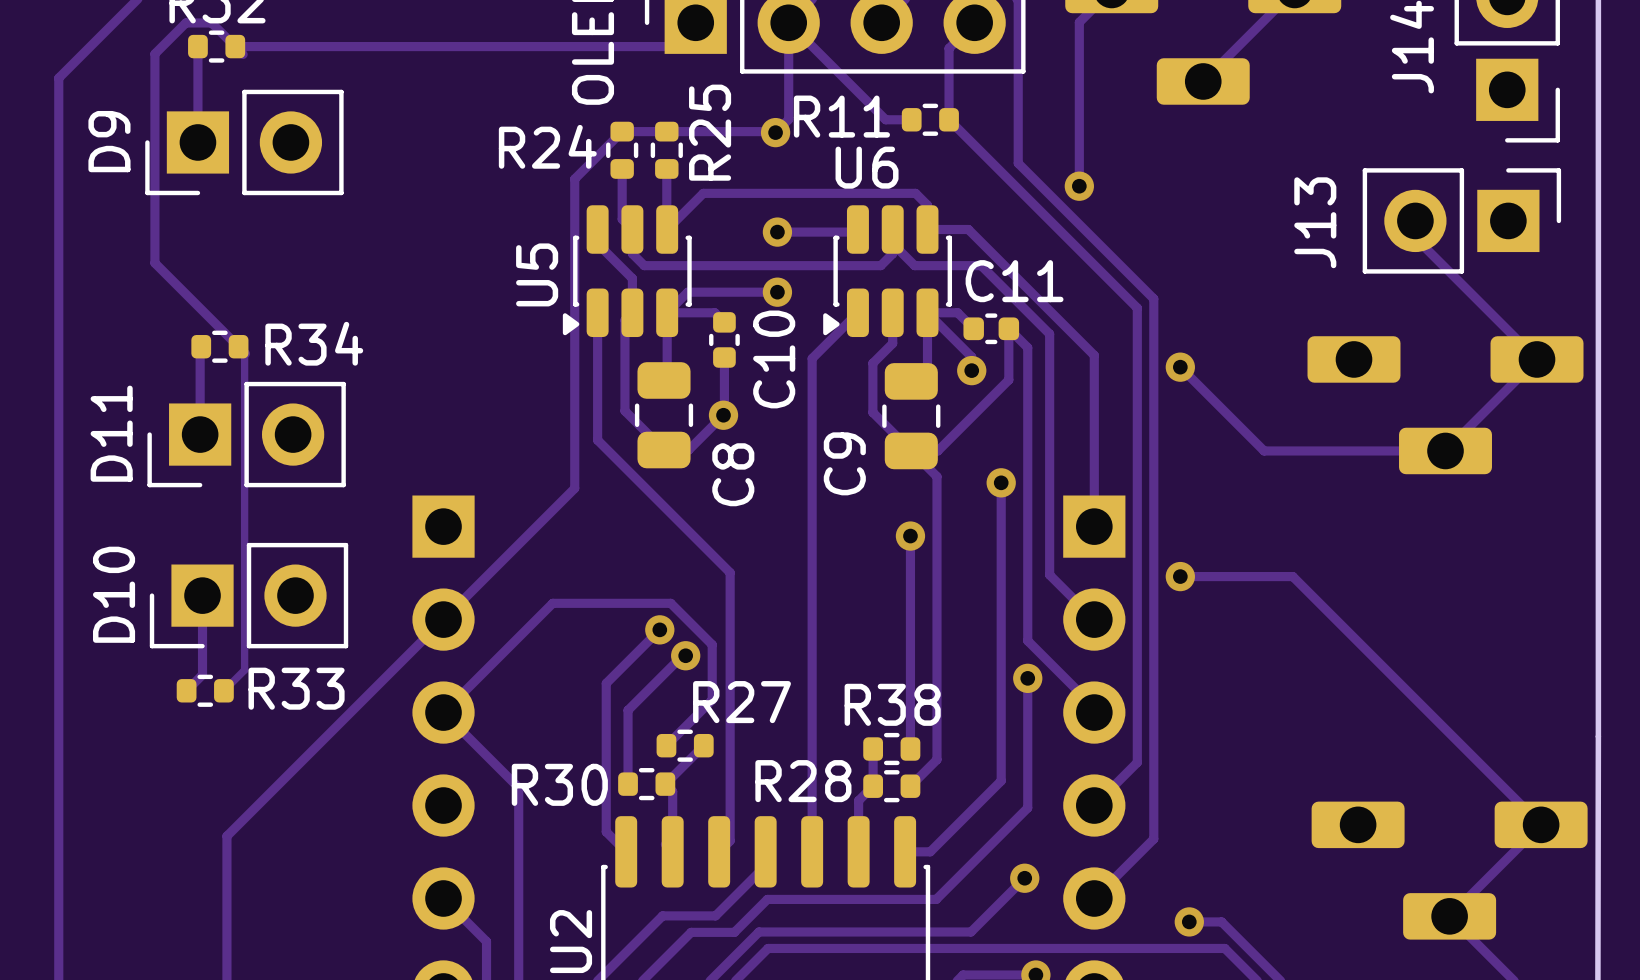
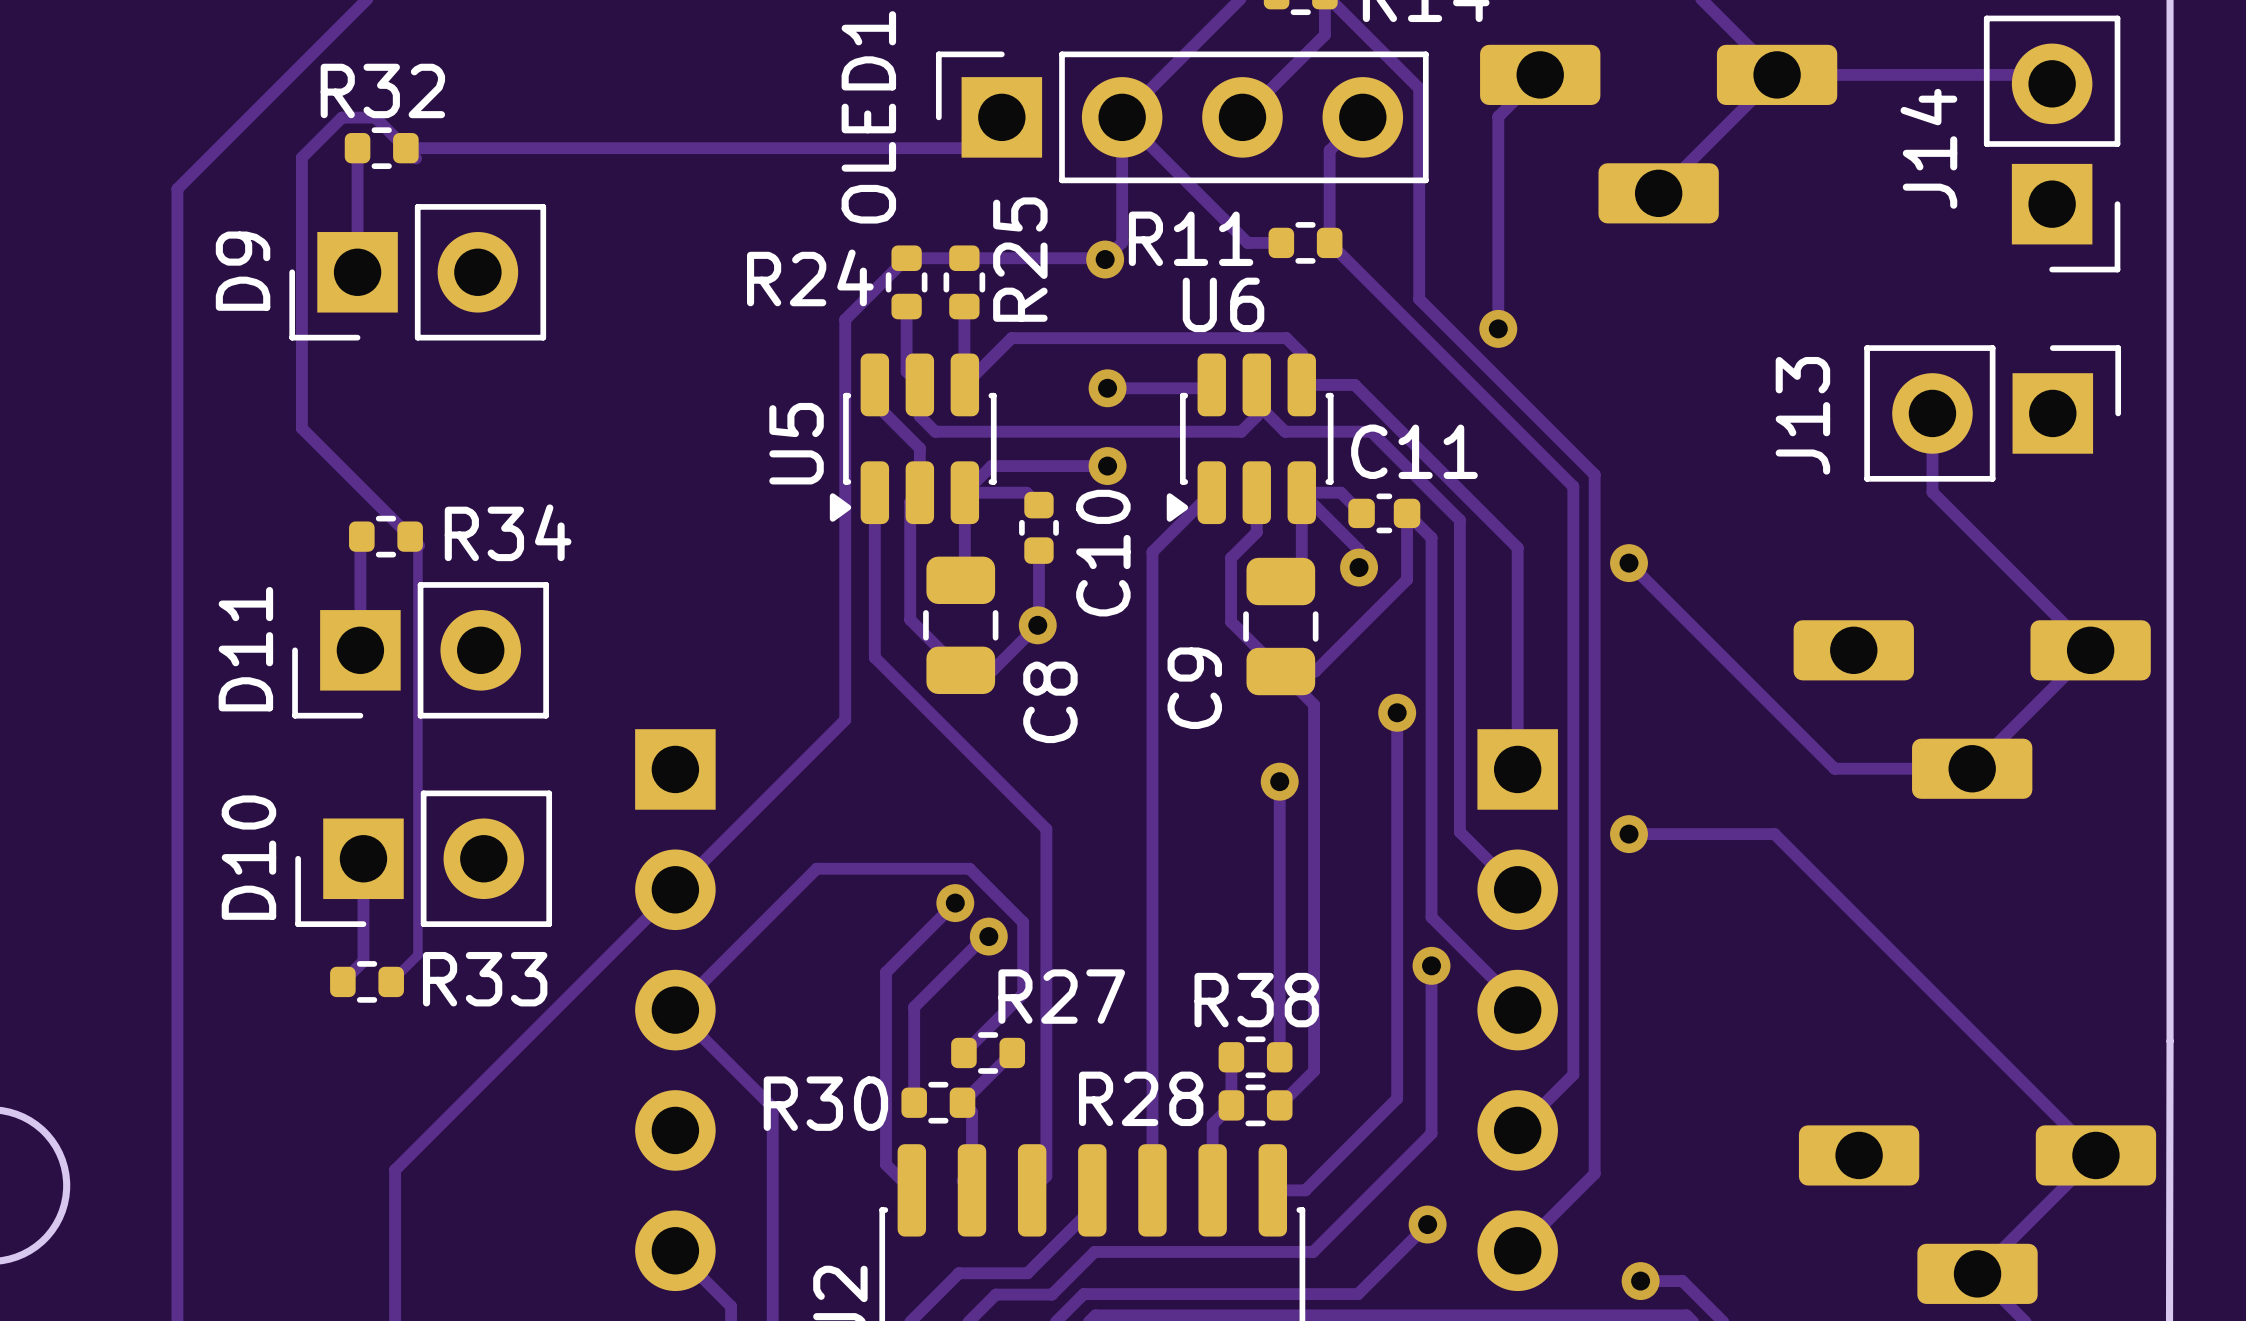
track: (1415, 220) (1415, 237) (1537, 359) (1445, 450) (1264, 450) -> (1932, 413) (1932, 492) (2090, 650) (1972, 768) (1834, 768) (1737, 671)
J13 position: (1461, 220) -> (1992, 413)
part position: (1445, 405) -> (1972, 709)

